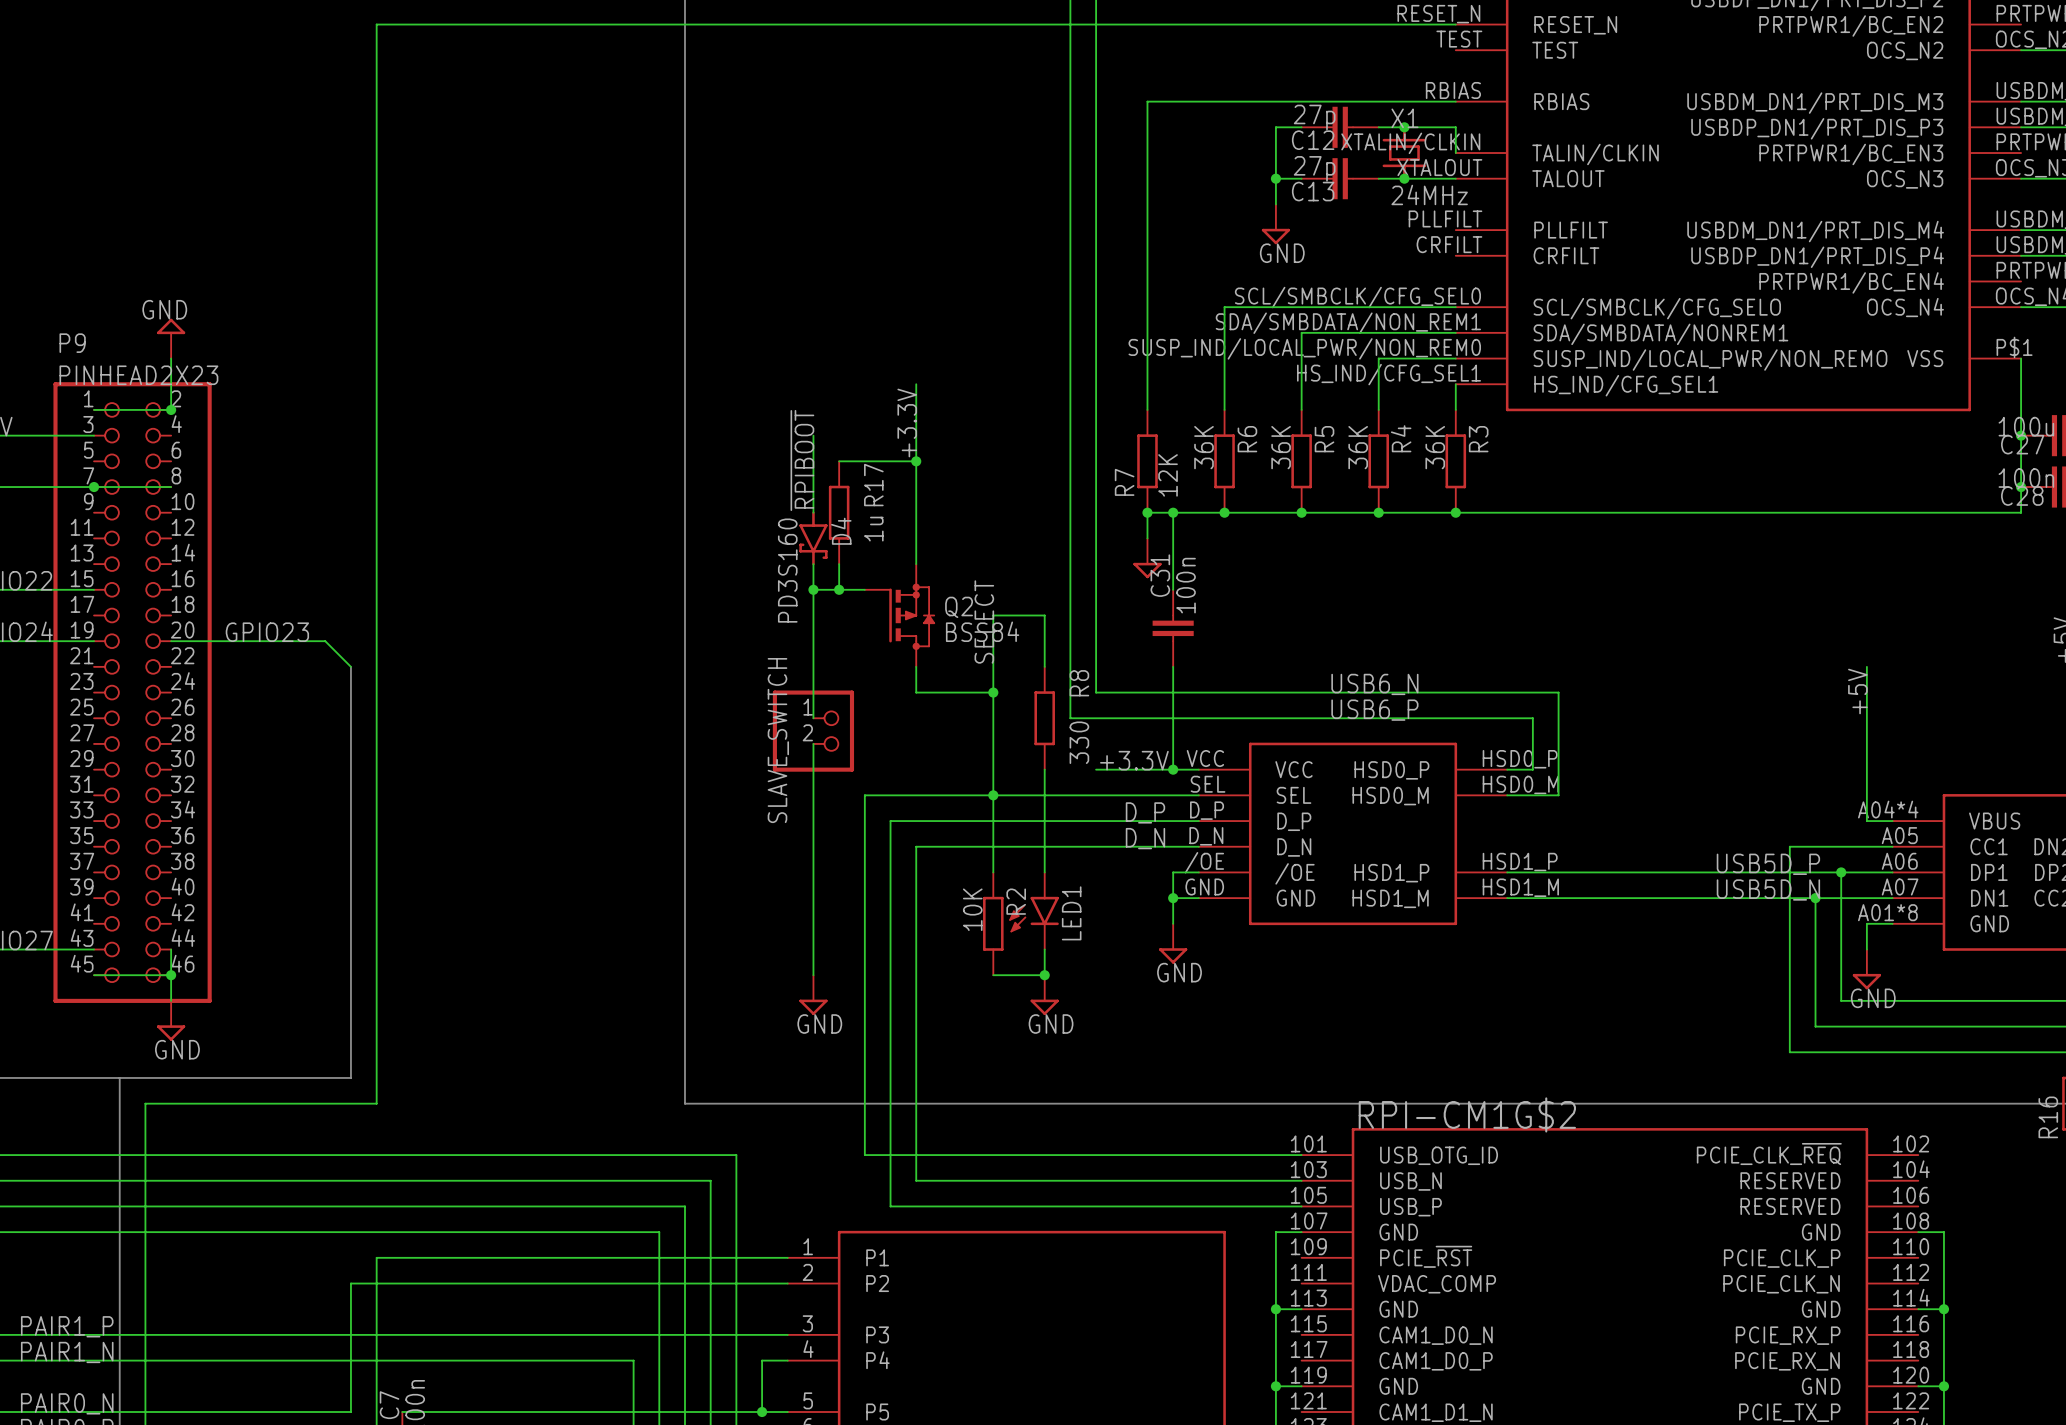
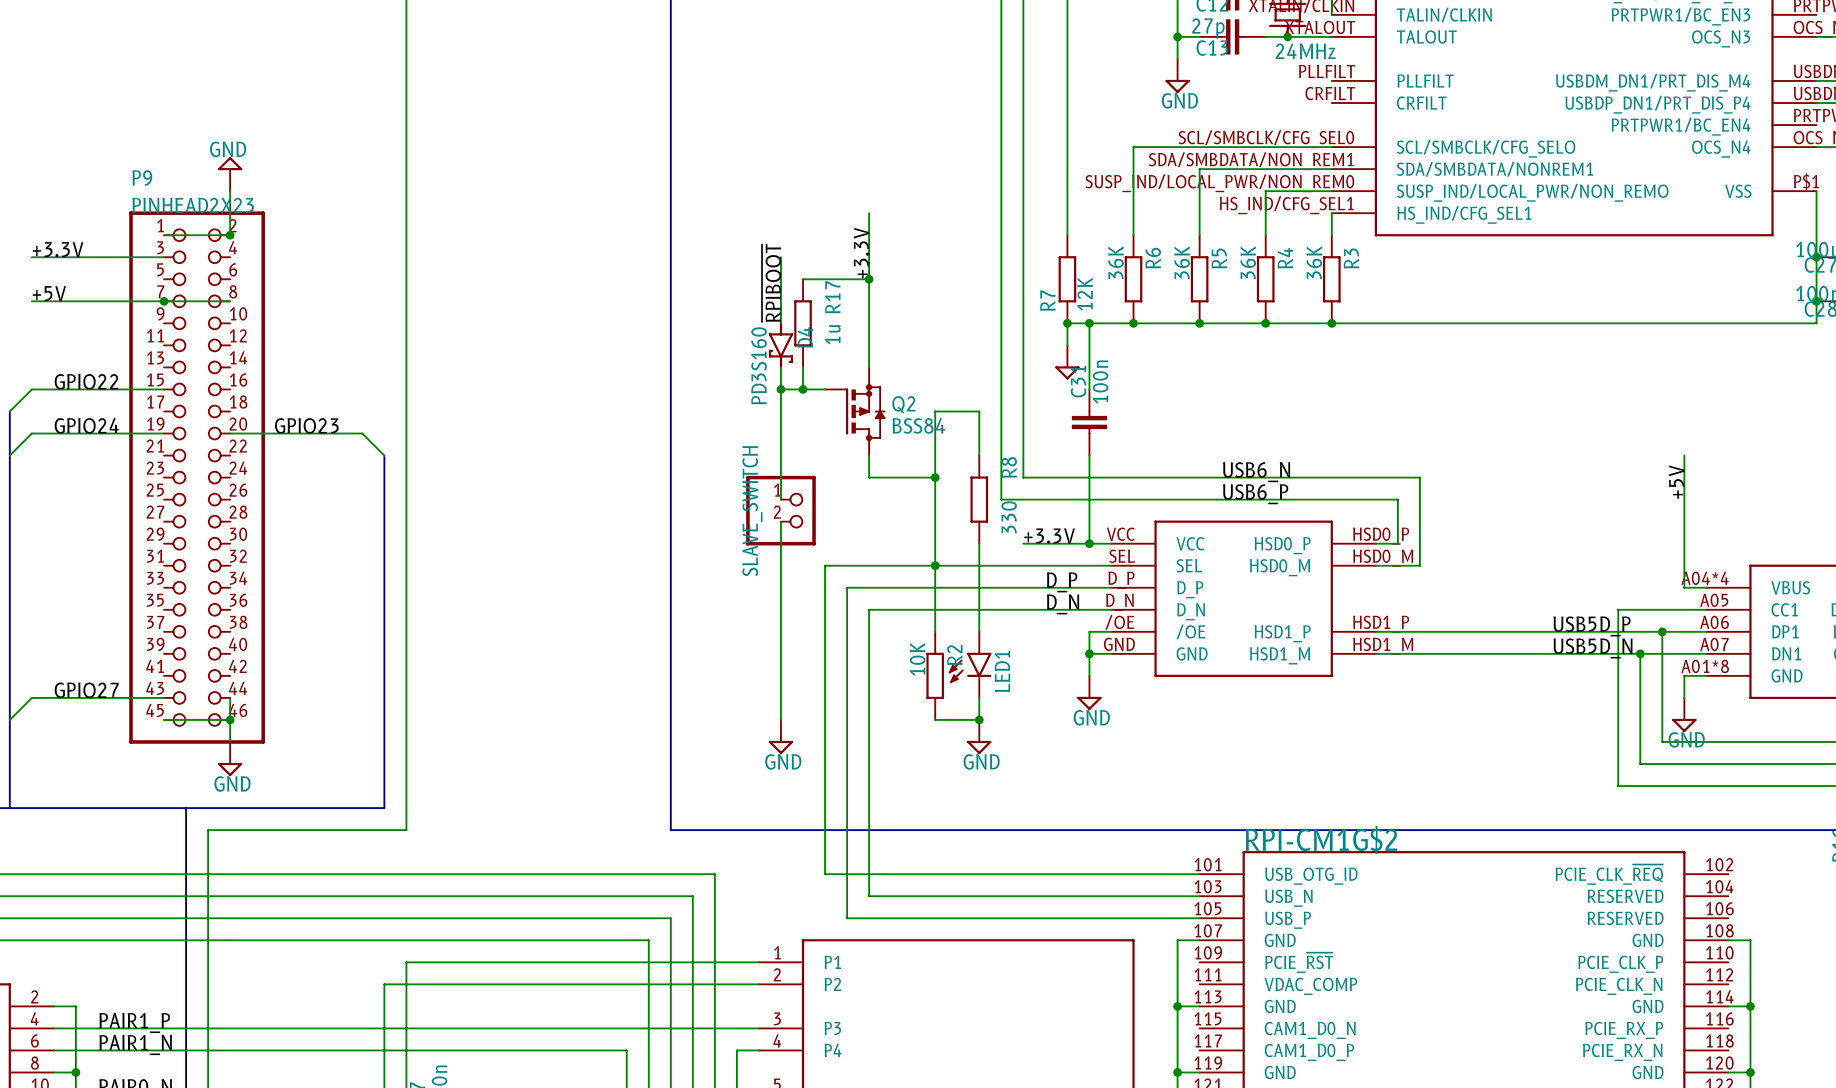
label: SELECT (984, 622) -> none

